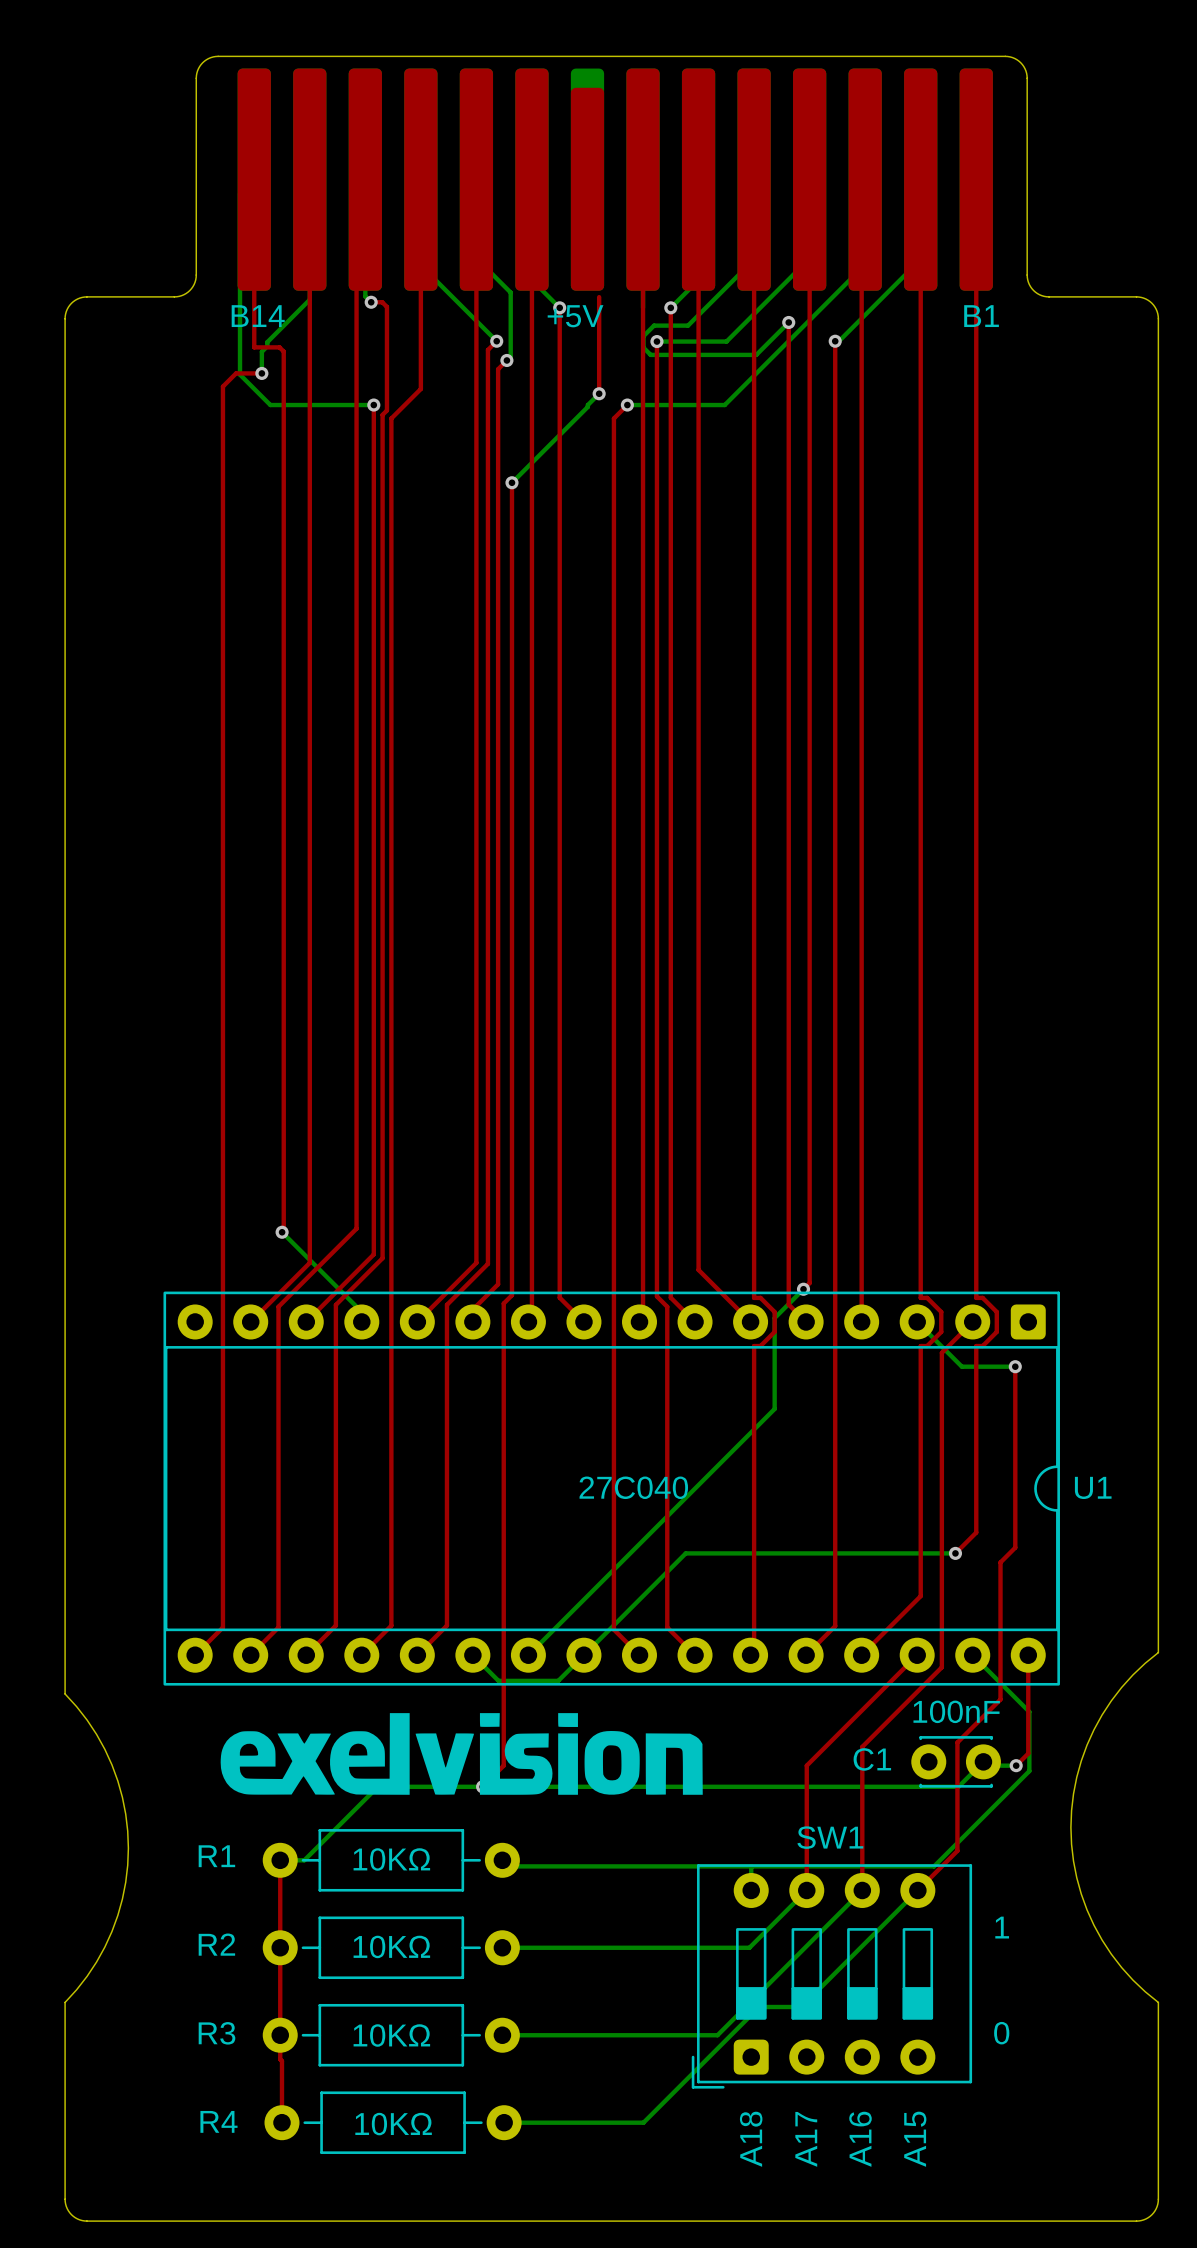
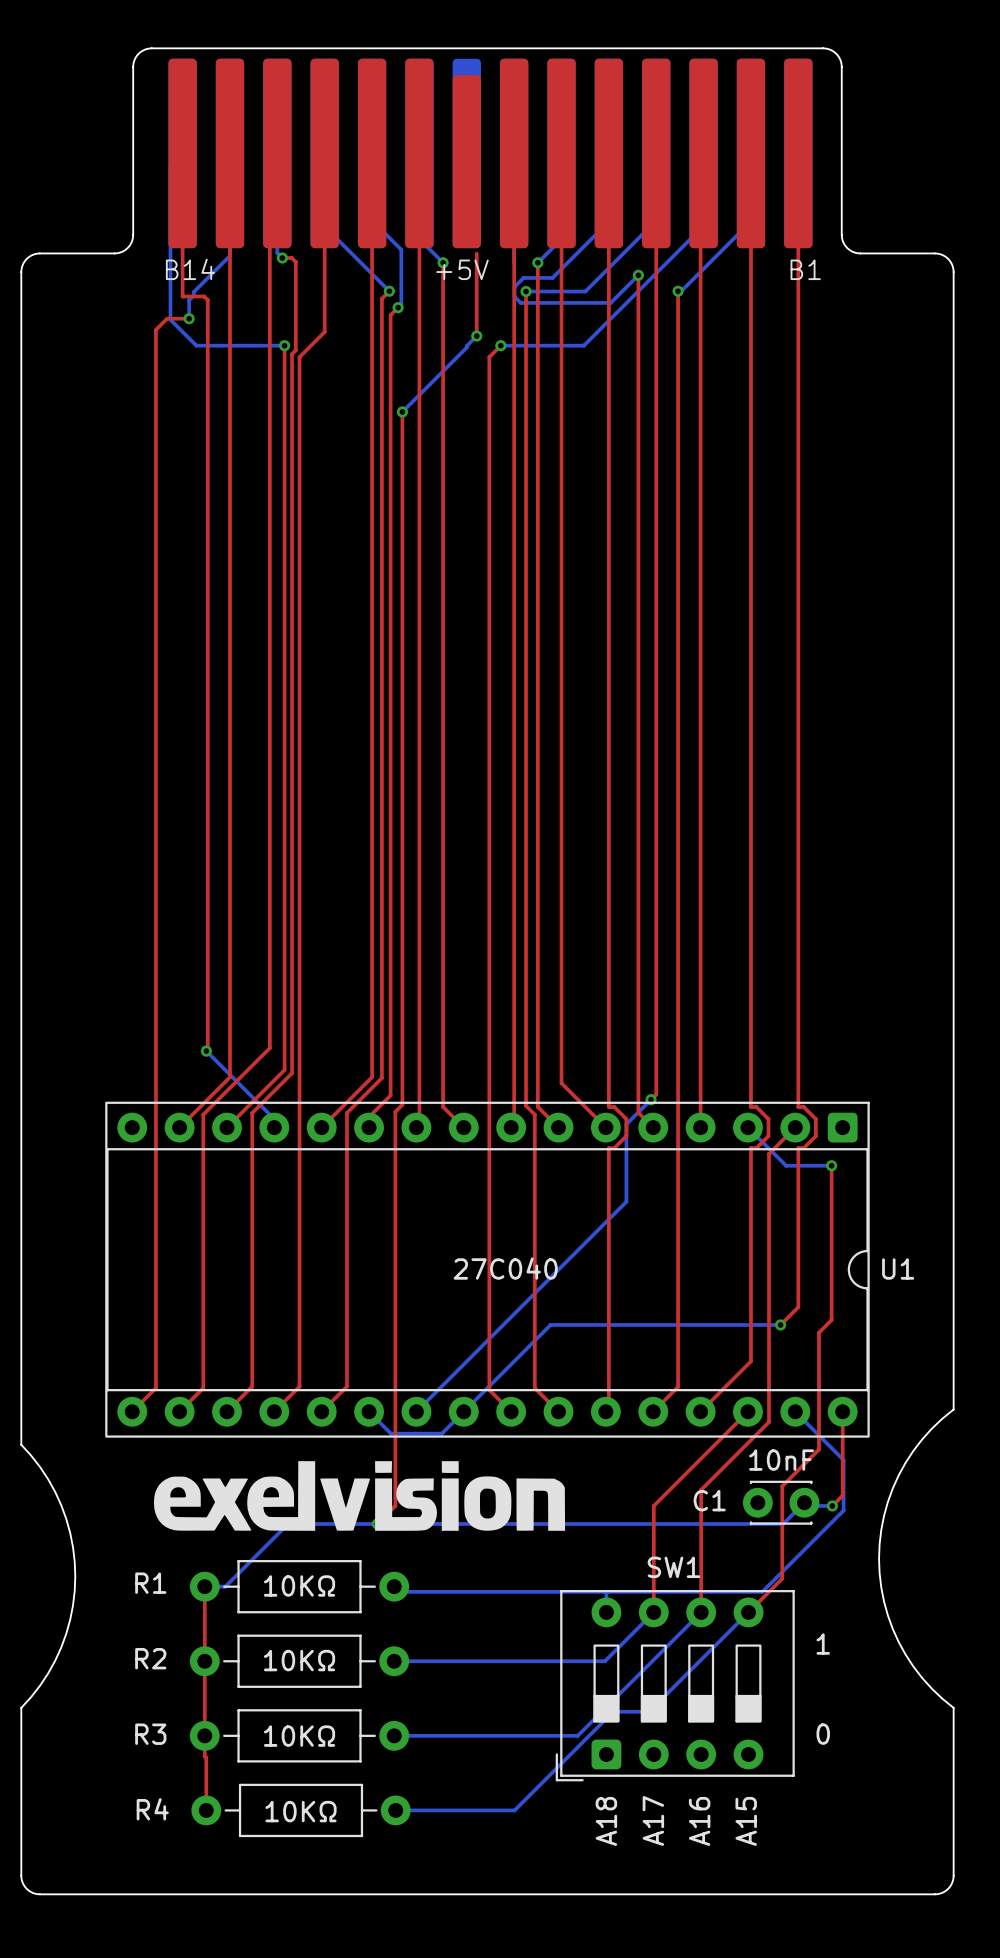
C1 value: 100nF (956, 1711) -> 10nF (781, 1460)

